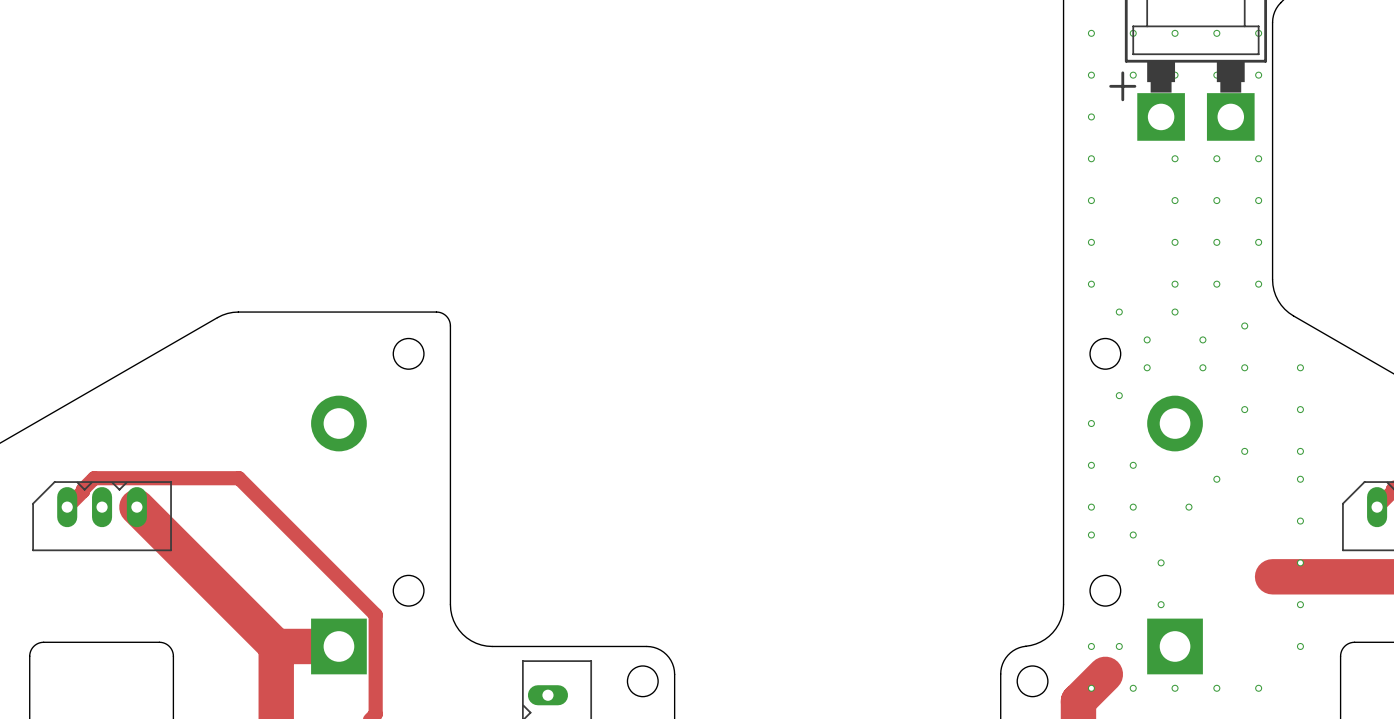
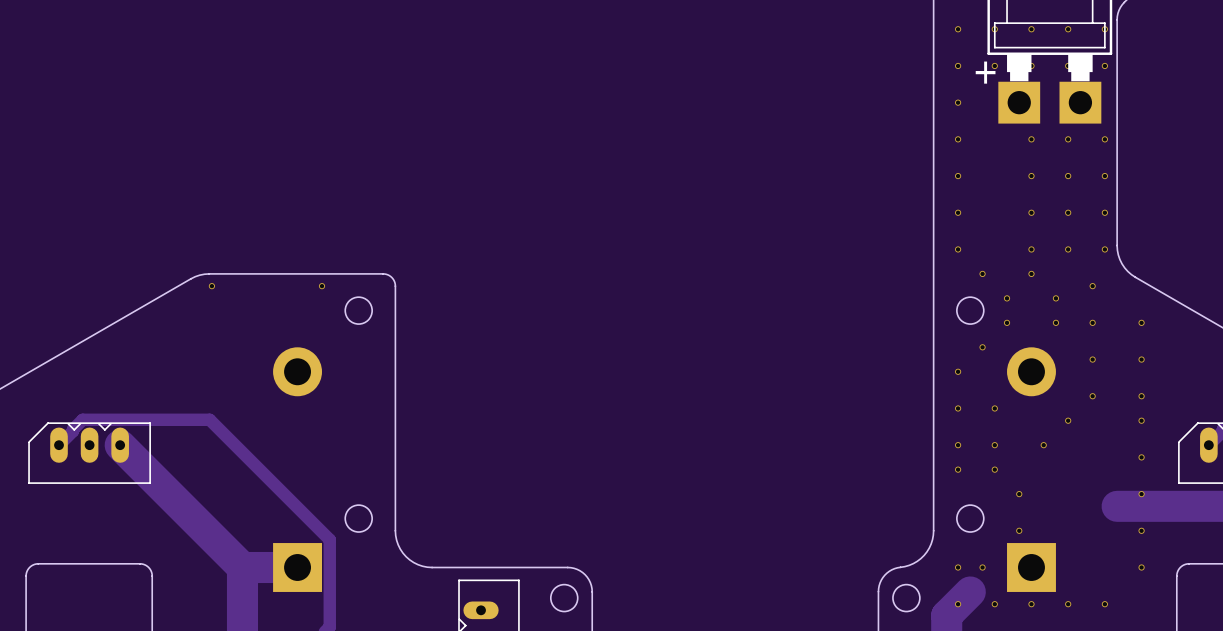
via: none -> (211, 286)
via: none -> (322, 286)

